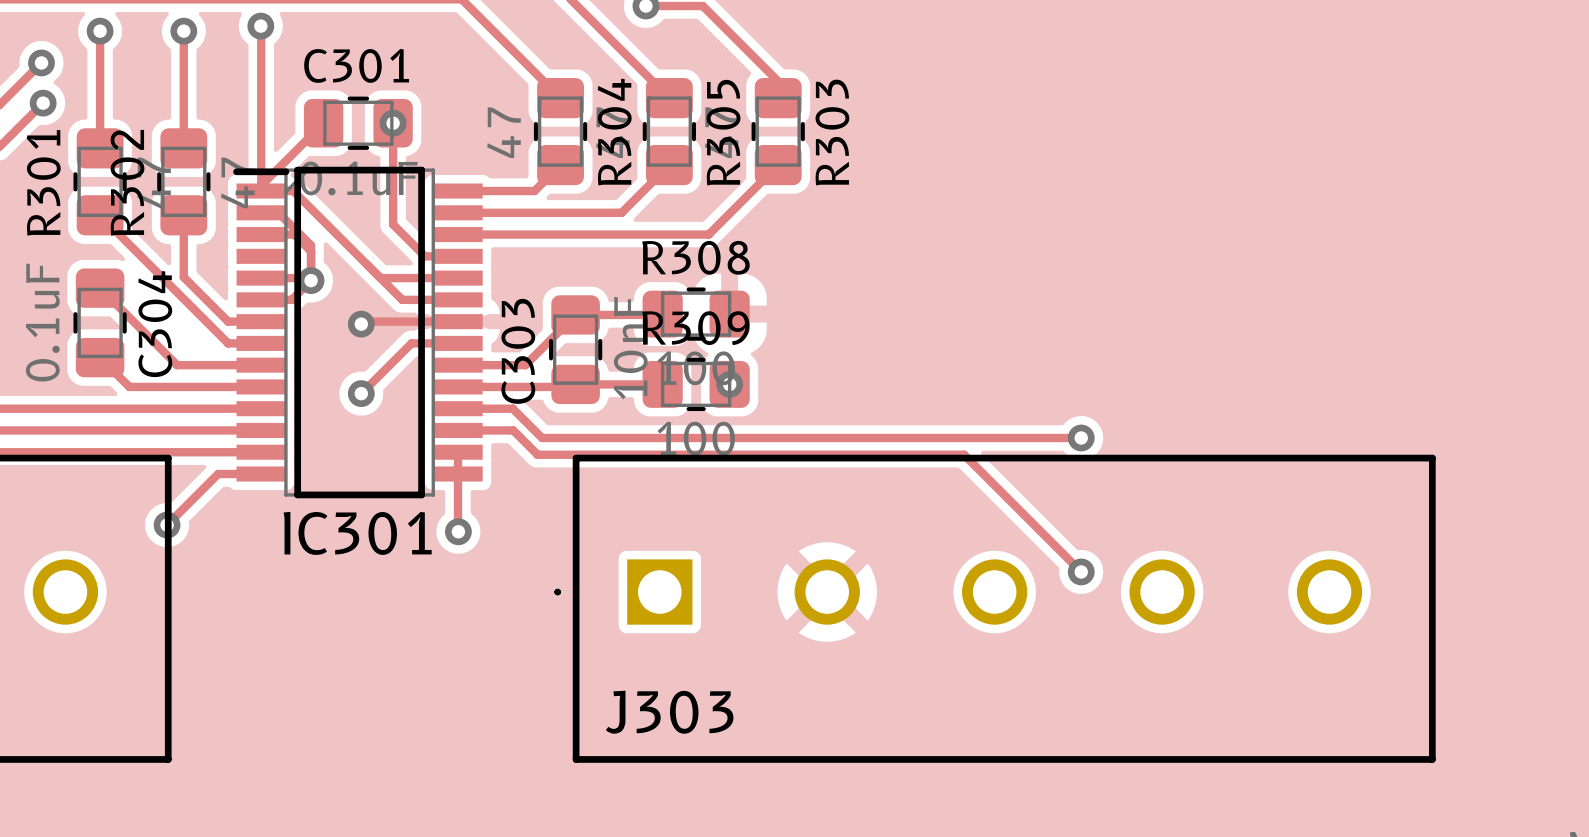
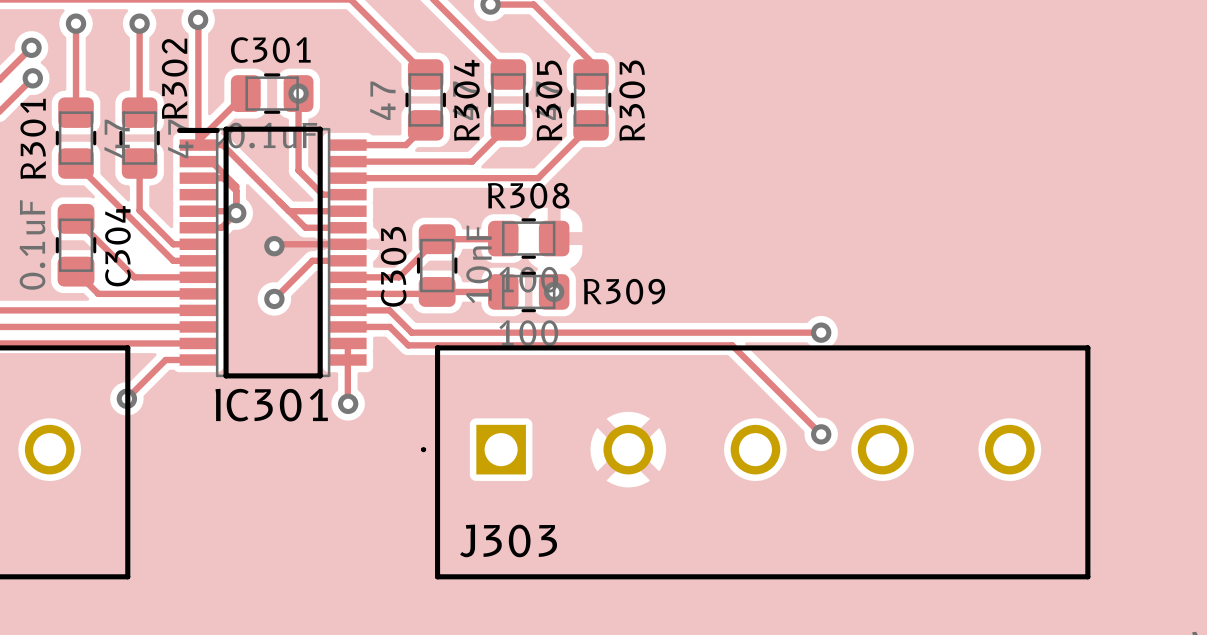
R302 name position: R302 (127, 182) -> R302 (174, 78)
R309 name position: R309 (695, 328) -> R309 (624, 291)

